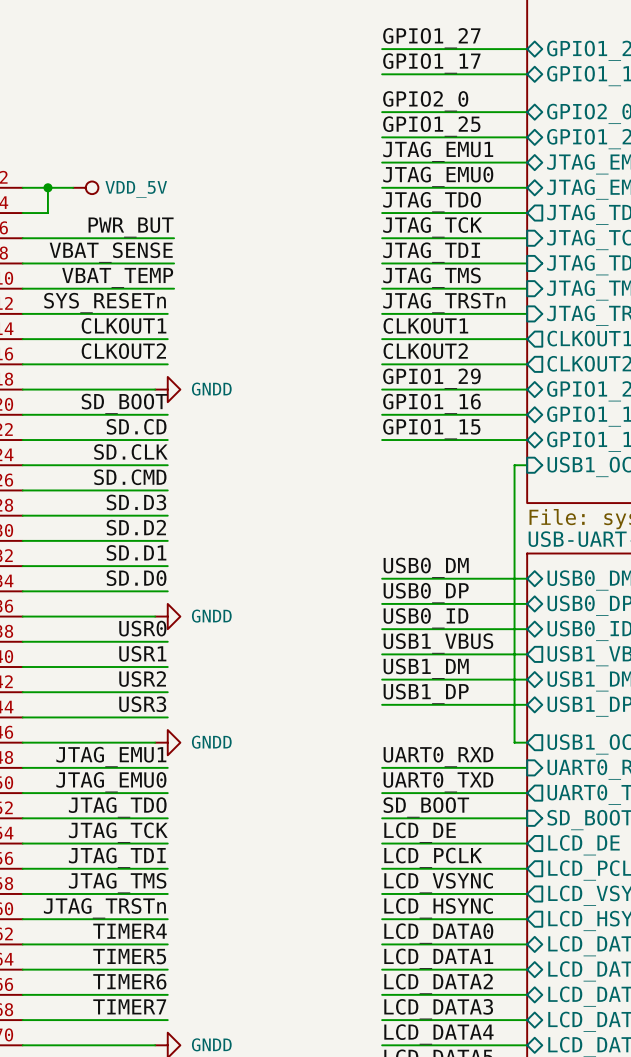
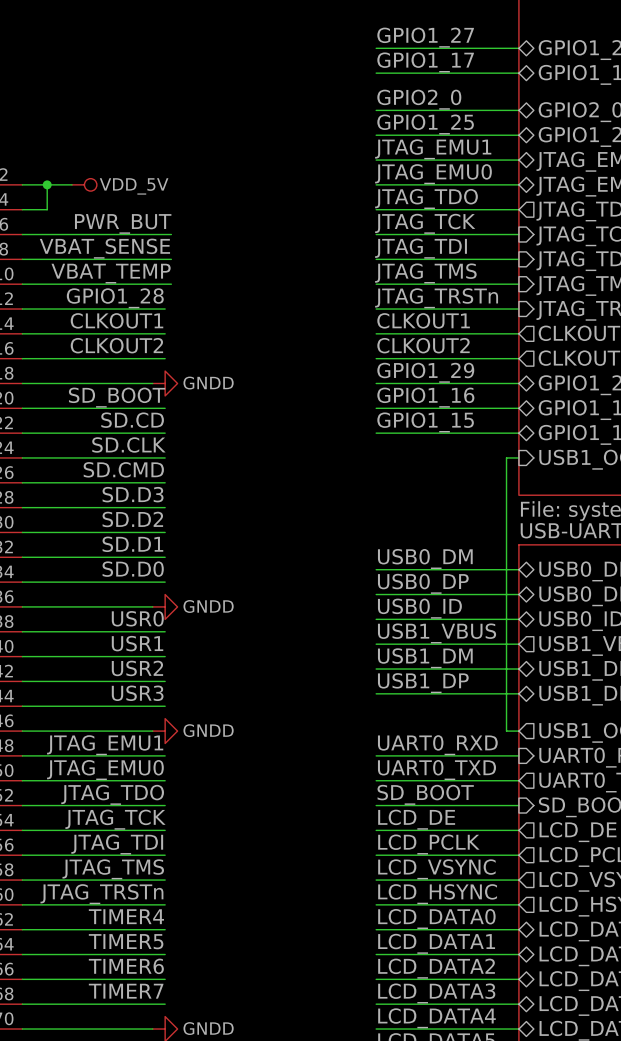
label: SYS_RESETn (105, 303) -> GPIO1_28 (115, 298)

